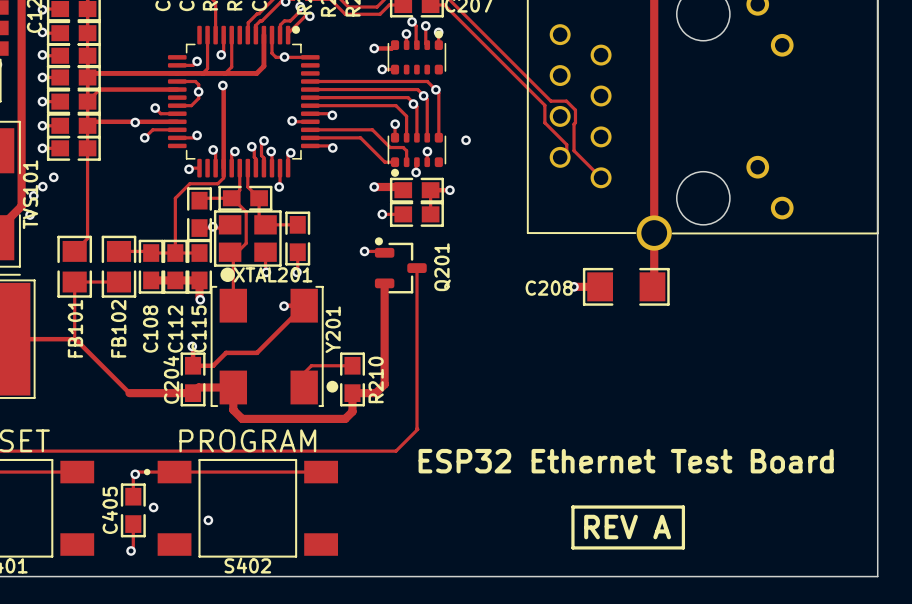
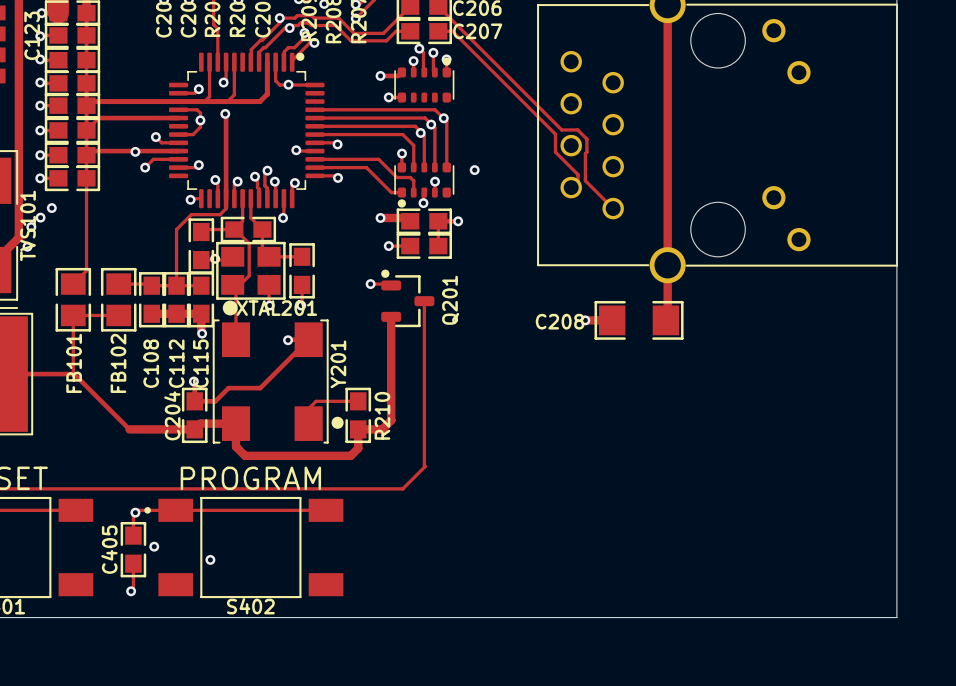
text: ESP32 Ethernet Test Board (626, 461) -> none
line: (572, 507) (683, 507) (683, 547) (572, 547) (572, 507) -> none
text: REV A (627, 527) -> none

